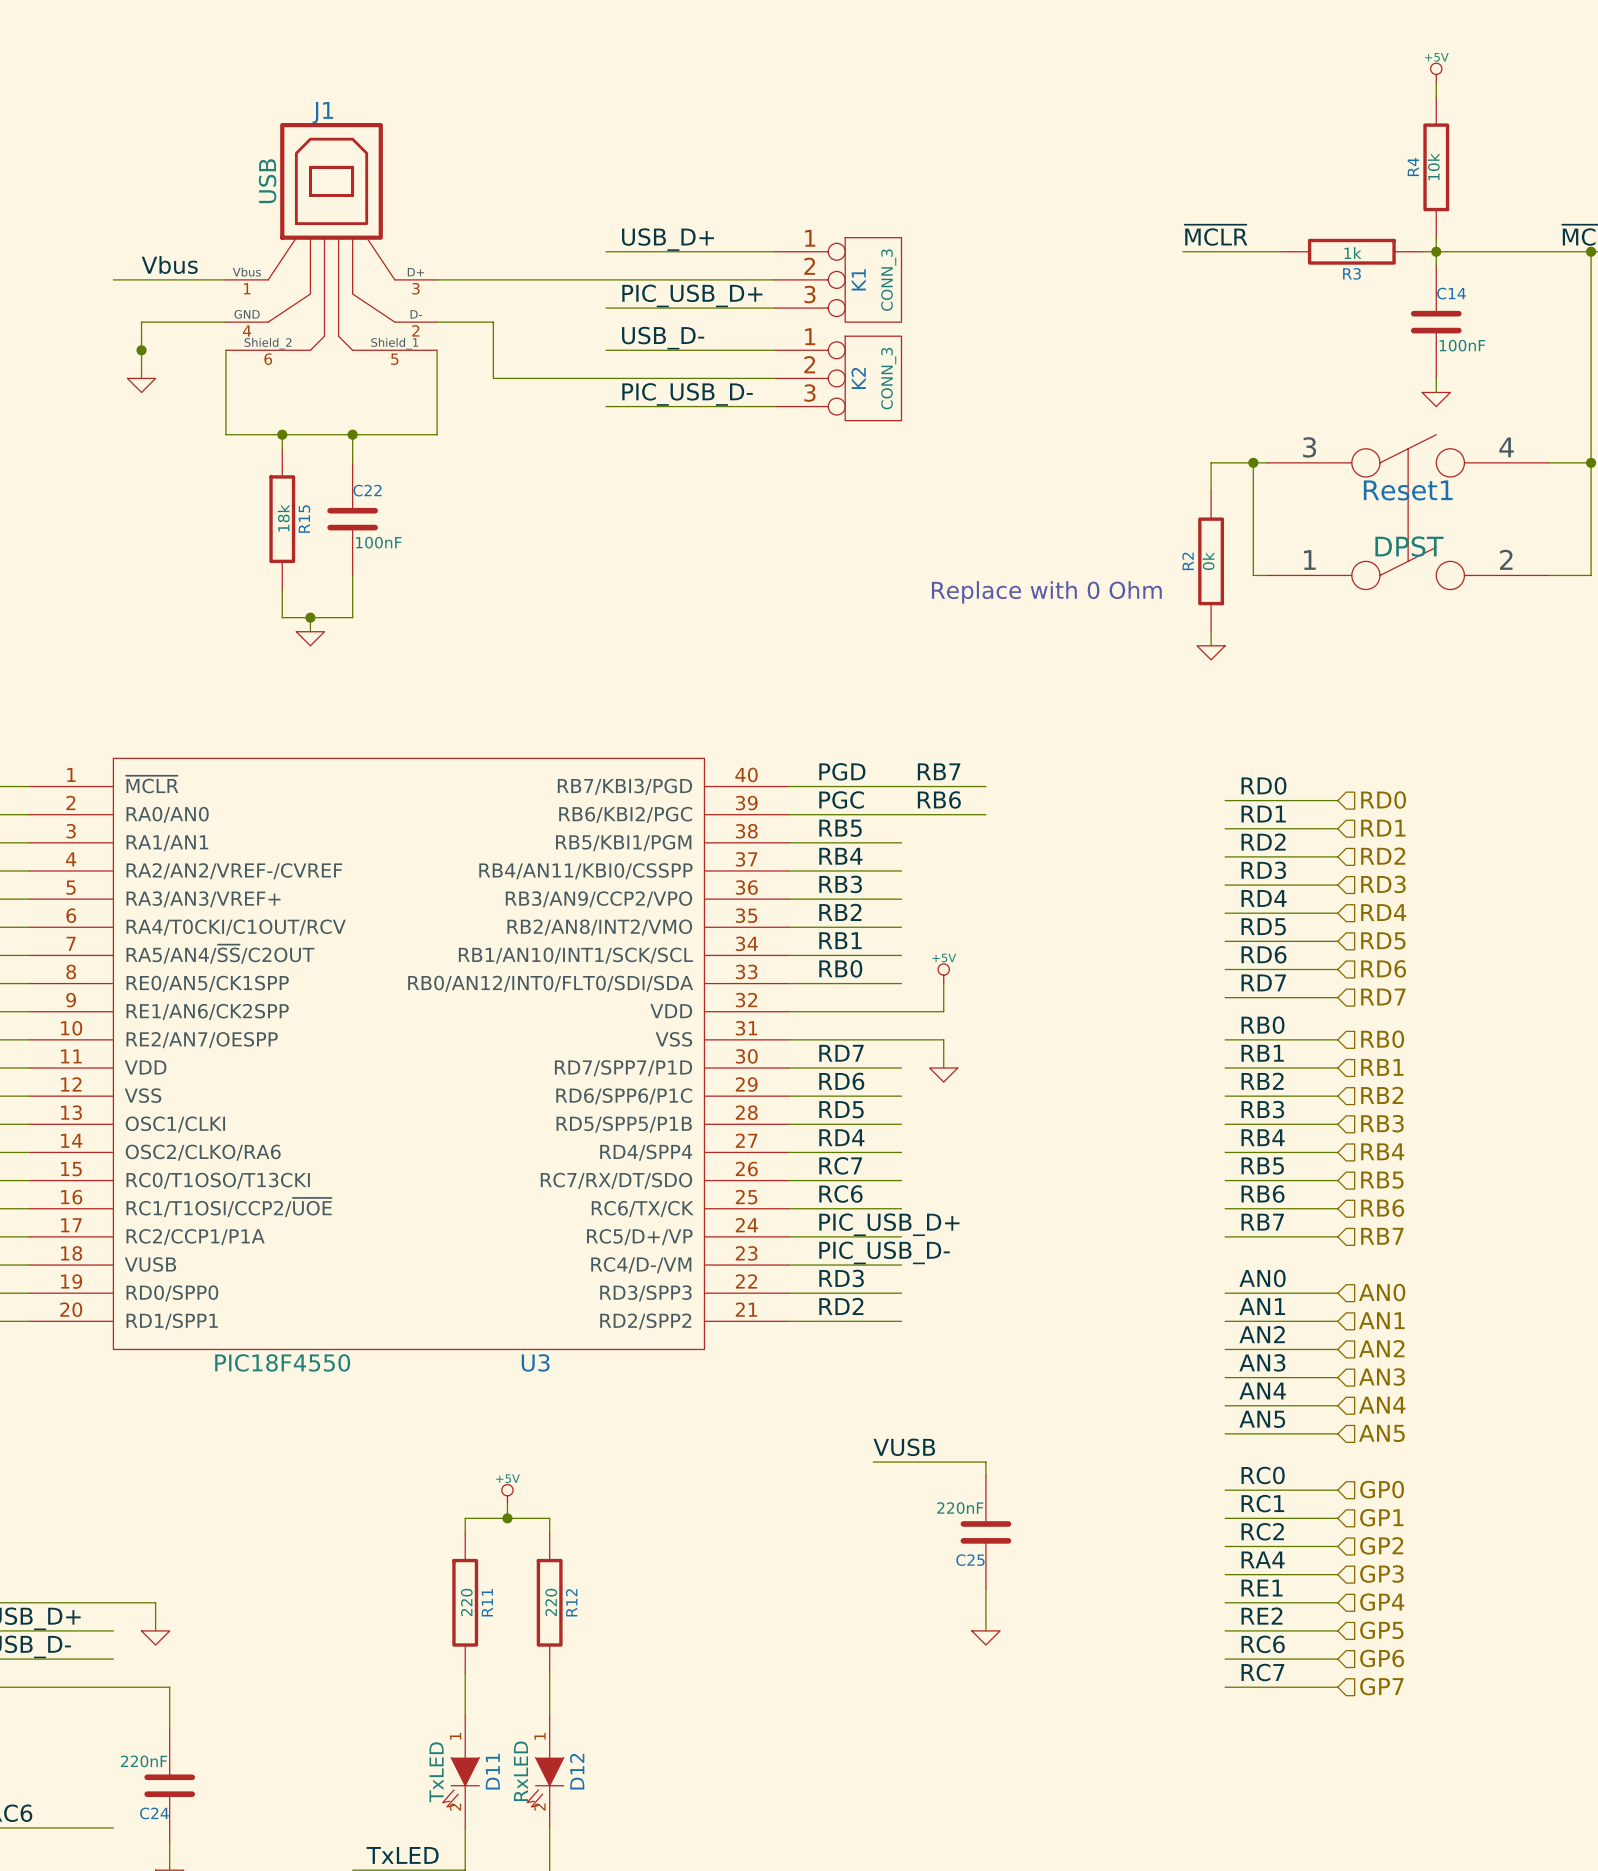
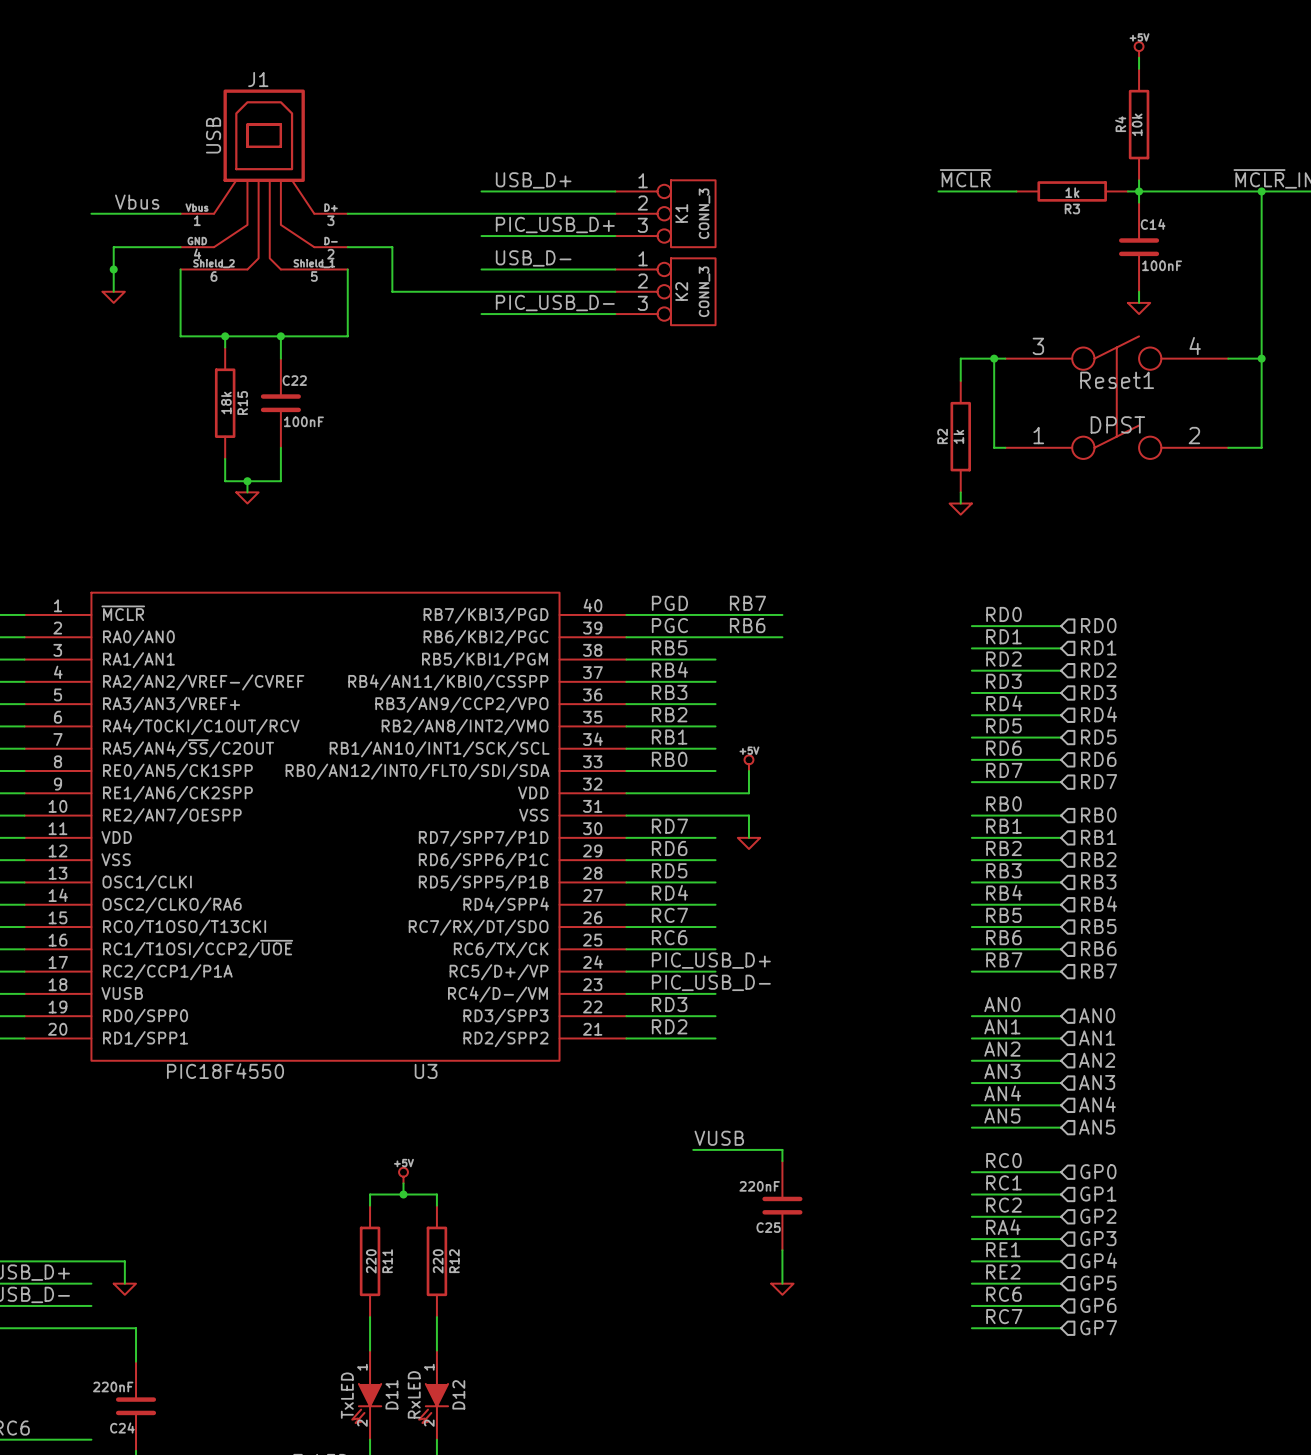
R2 value: 0k (1208, 561) -> 1k (958, 436)
text: Replace with 0 Ohm (1046, 592) -> none

